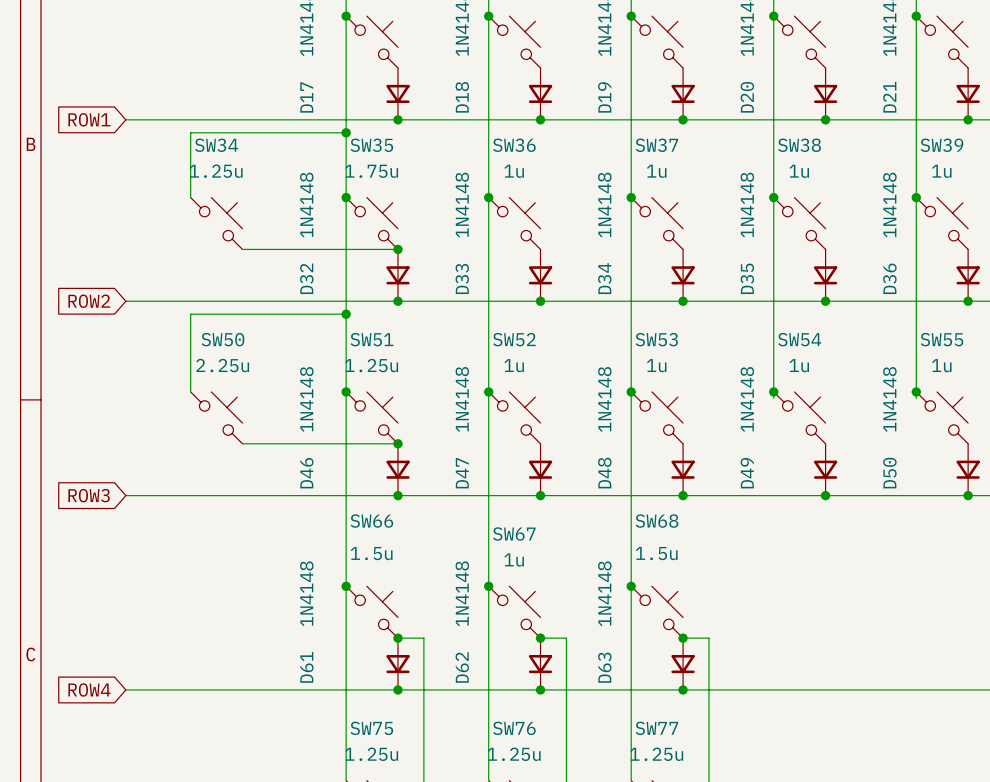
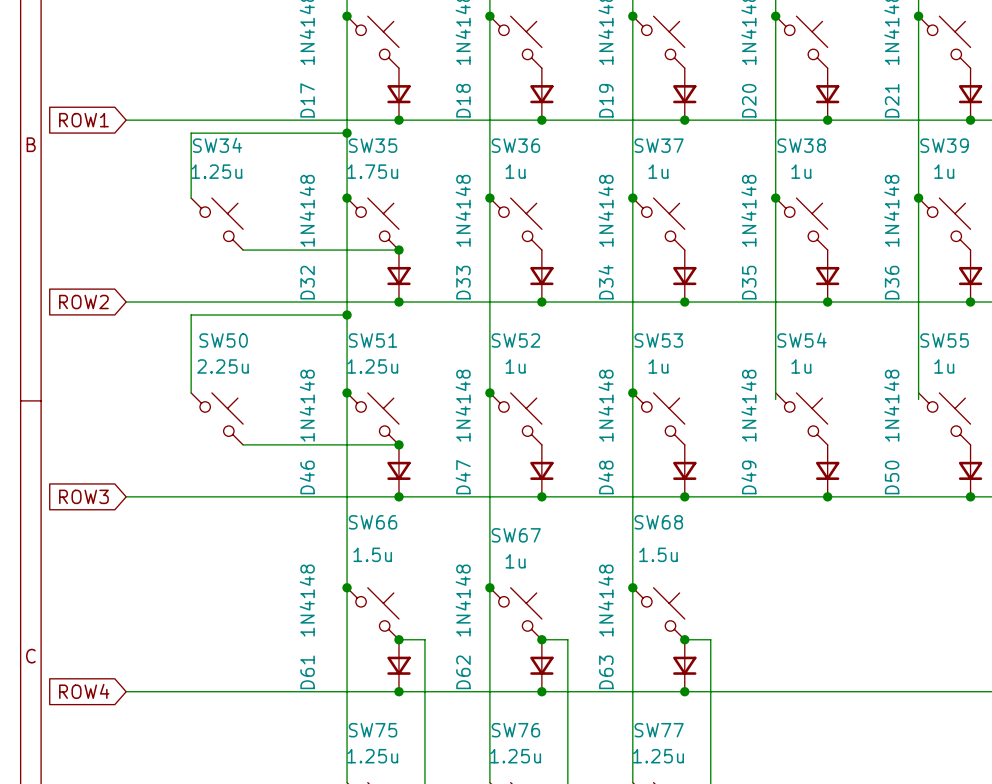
junction: (773, 391) -> none
junction: (916, 391) -> none

